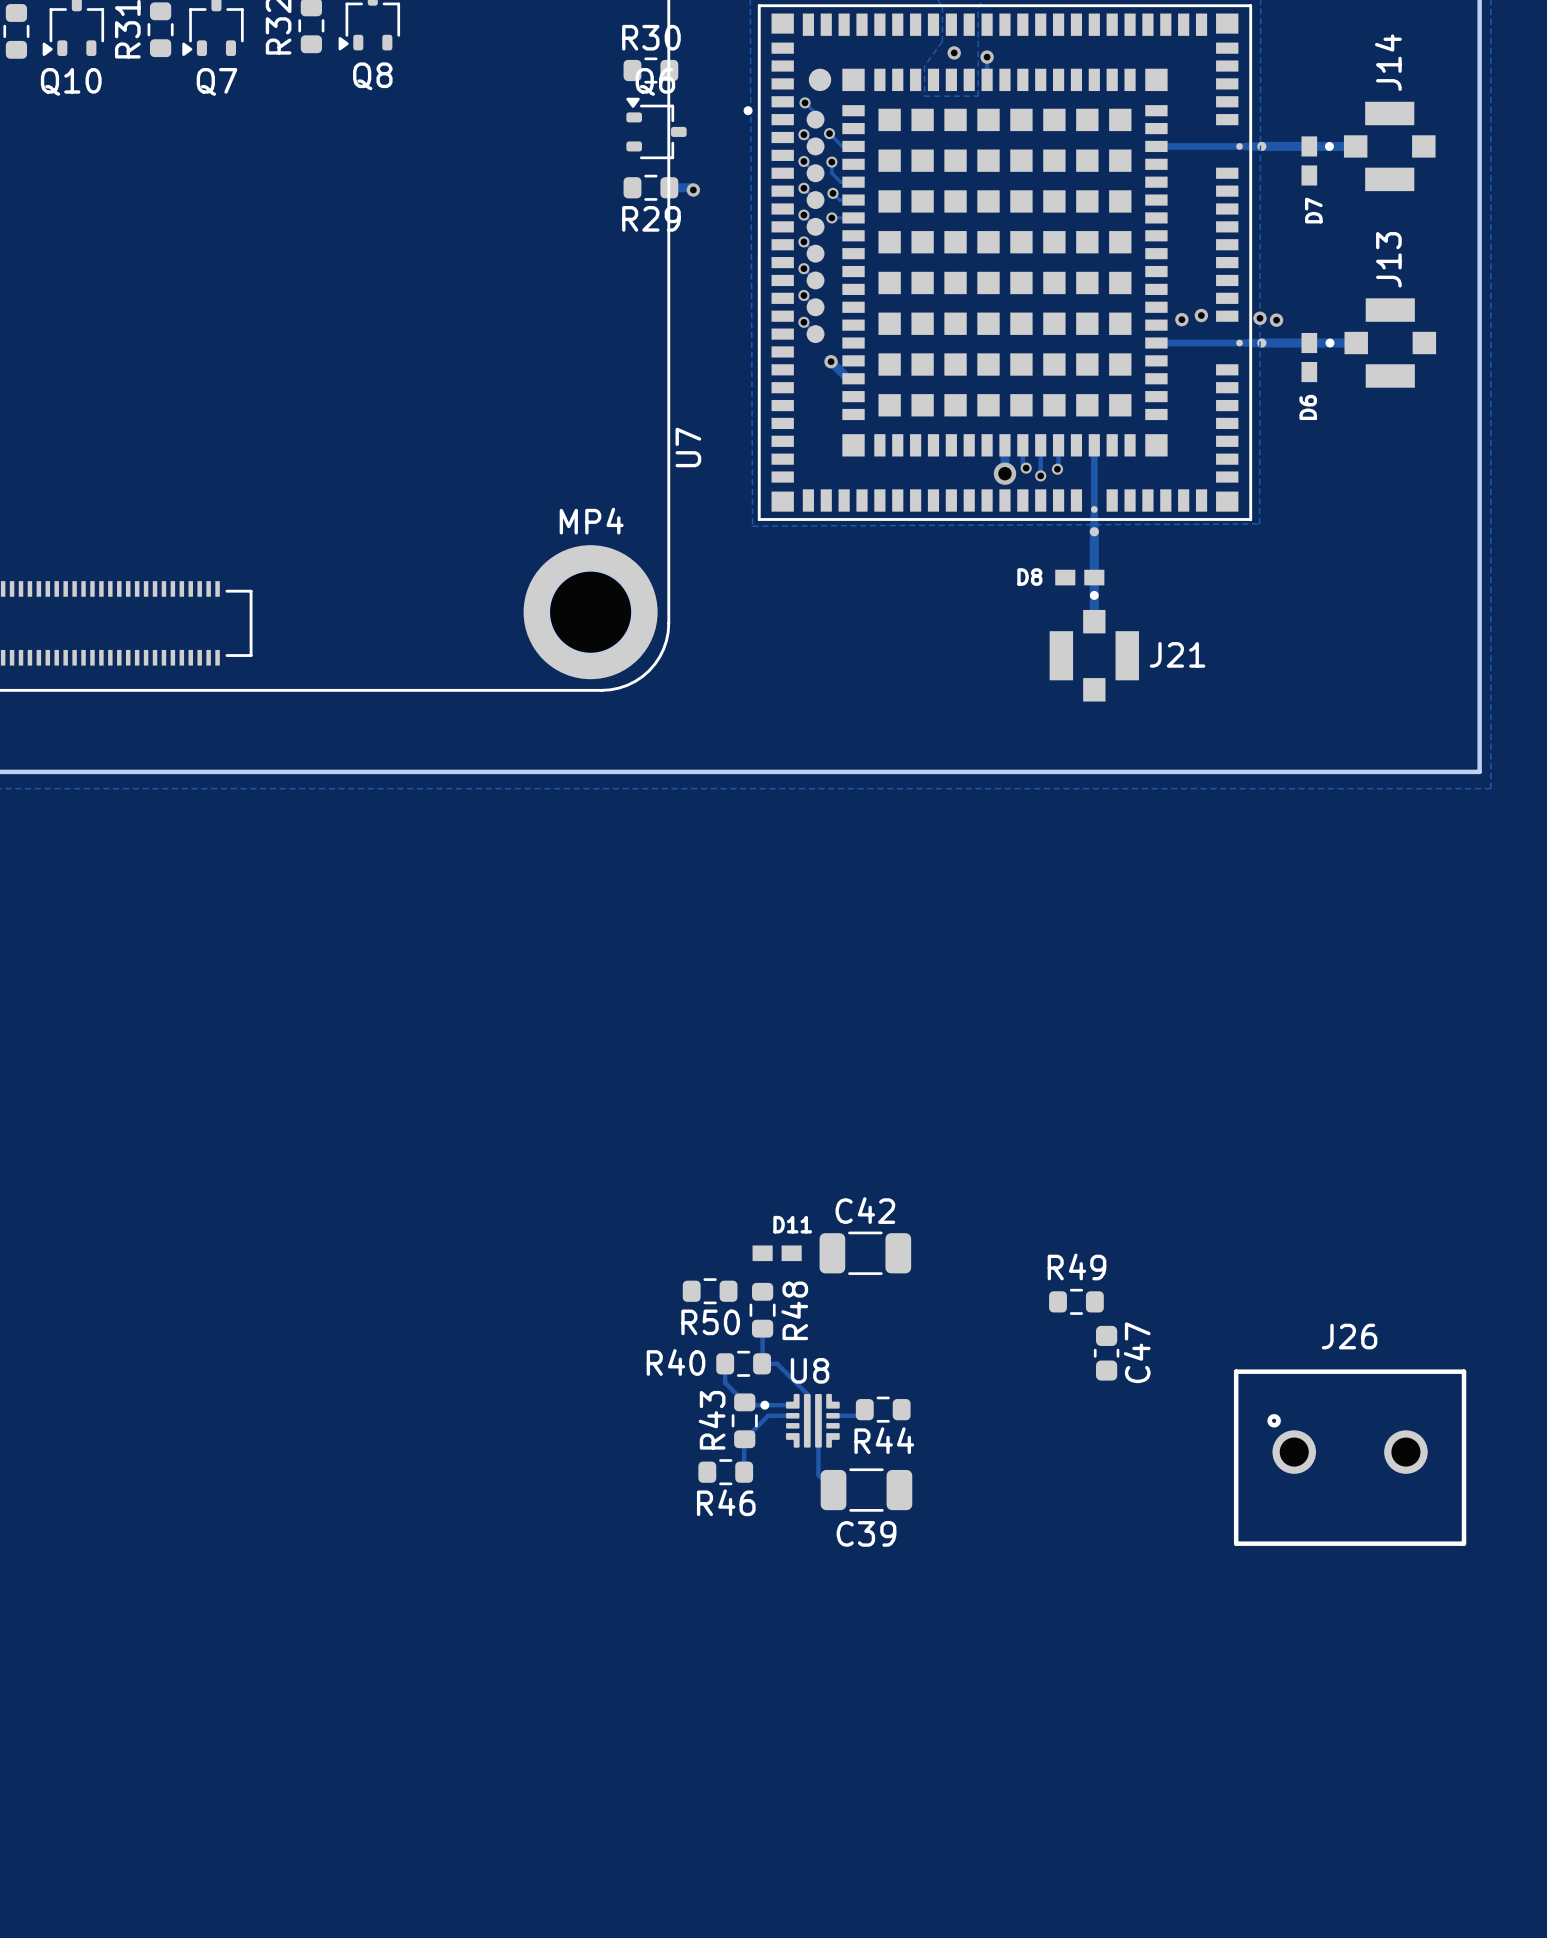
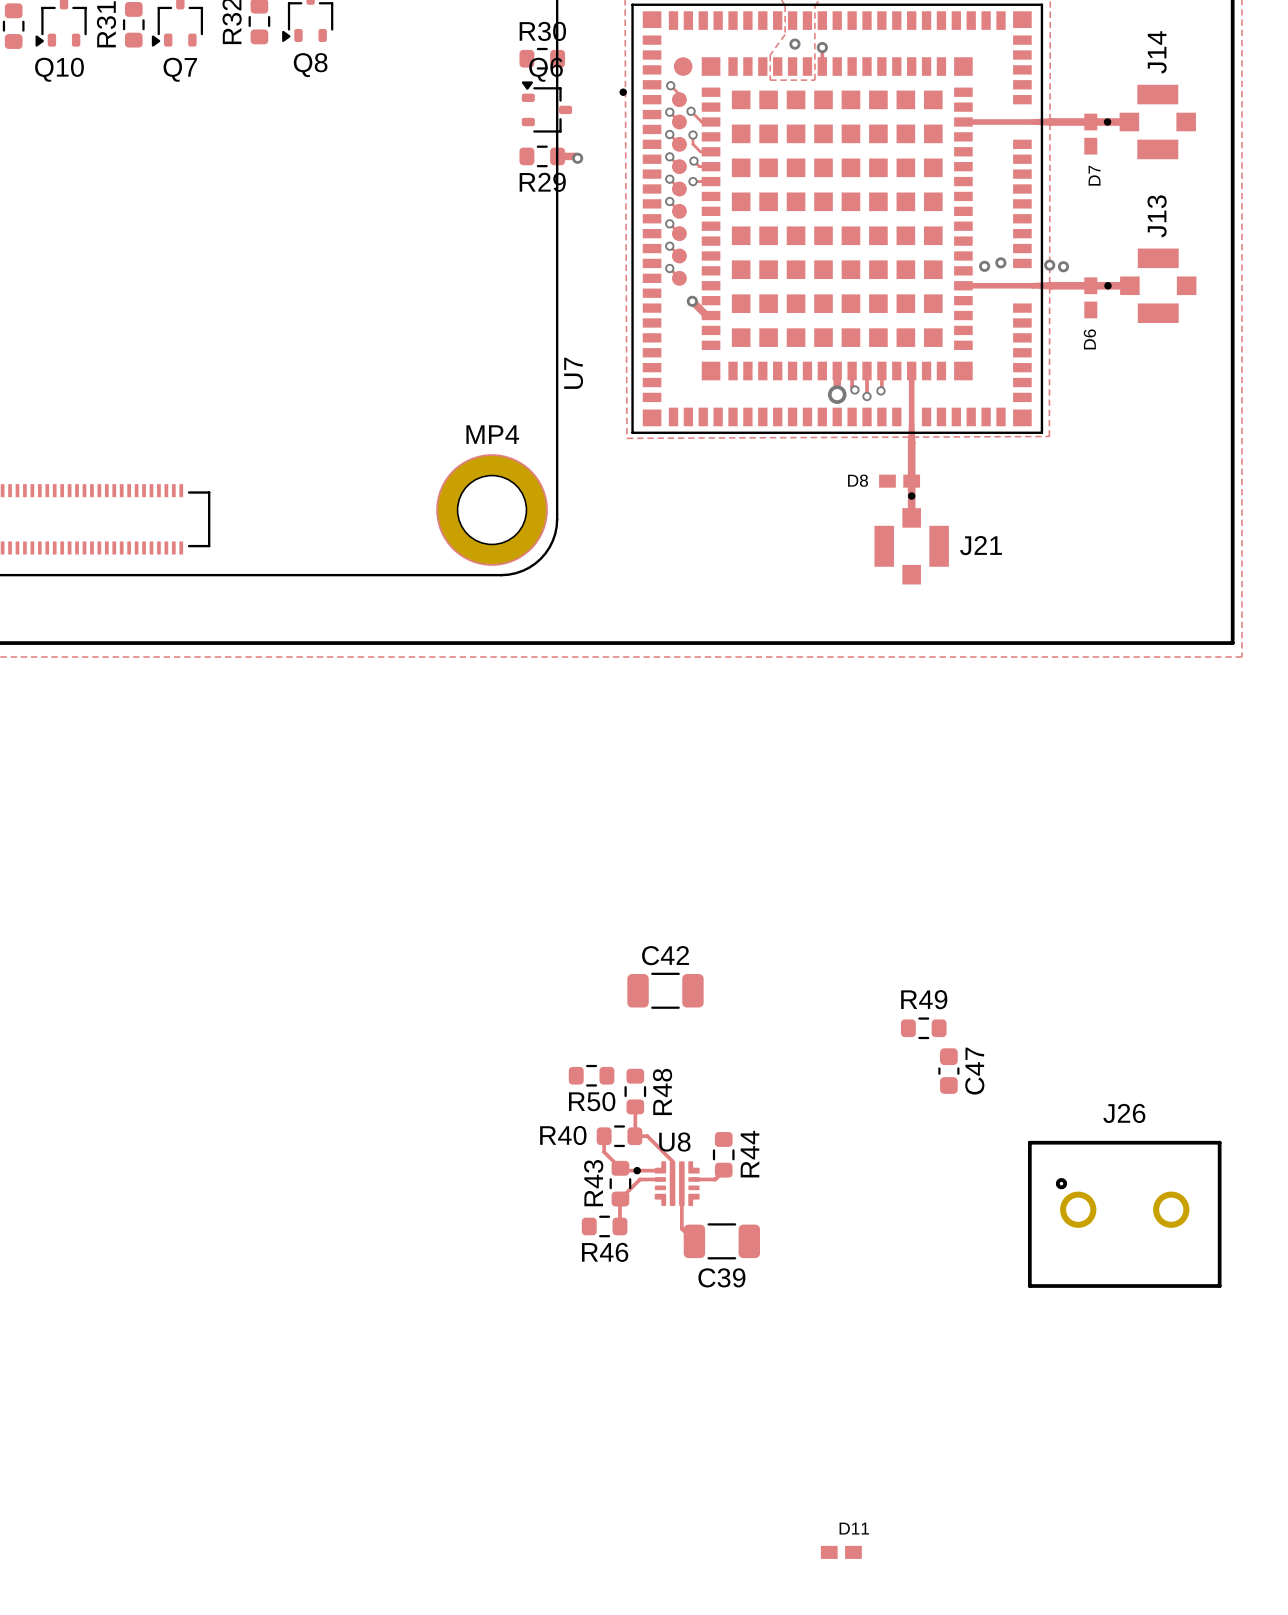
D11 position: (777, 1253) -> (841, 1552)
C42 position: (865, 1253) -> (665, 990)
R49 position: (1076, 1301) -> (923, 1028)
C47 position: (1106, 1353) -> (948, 1071)
R44 rotation: 0° (883, 1409) -> 90° clockwise (723, 1154)
R44 name position: R44 (884, 1440) -> R44 (750, 1154)

